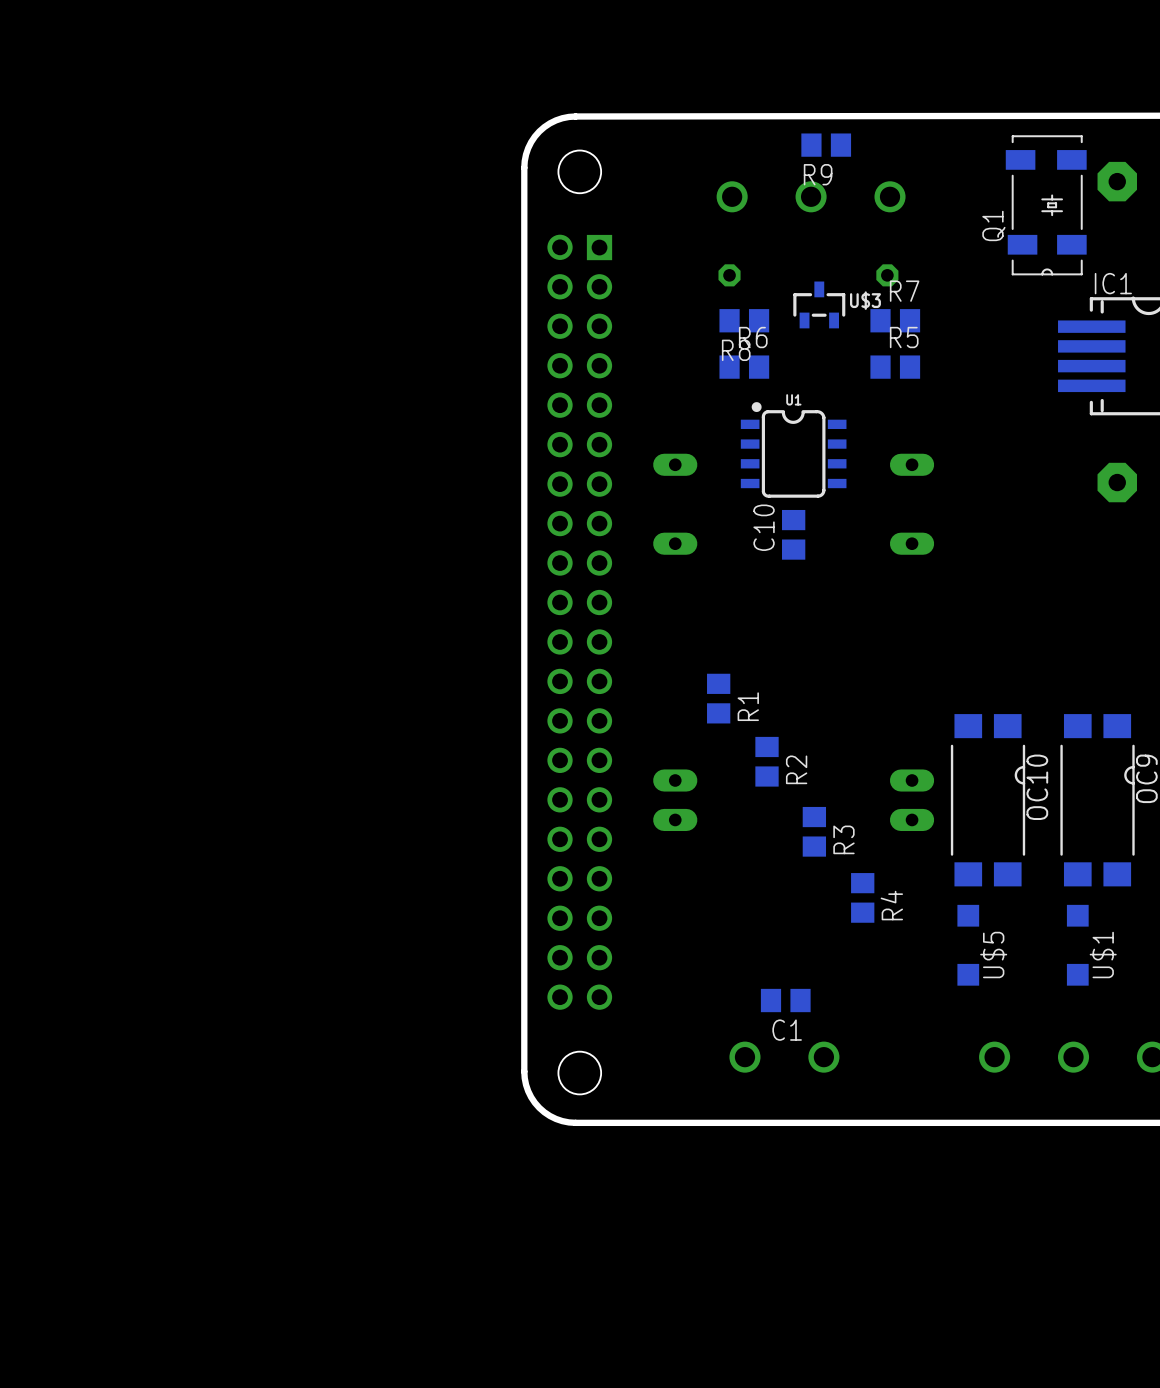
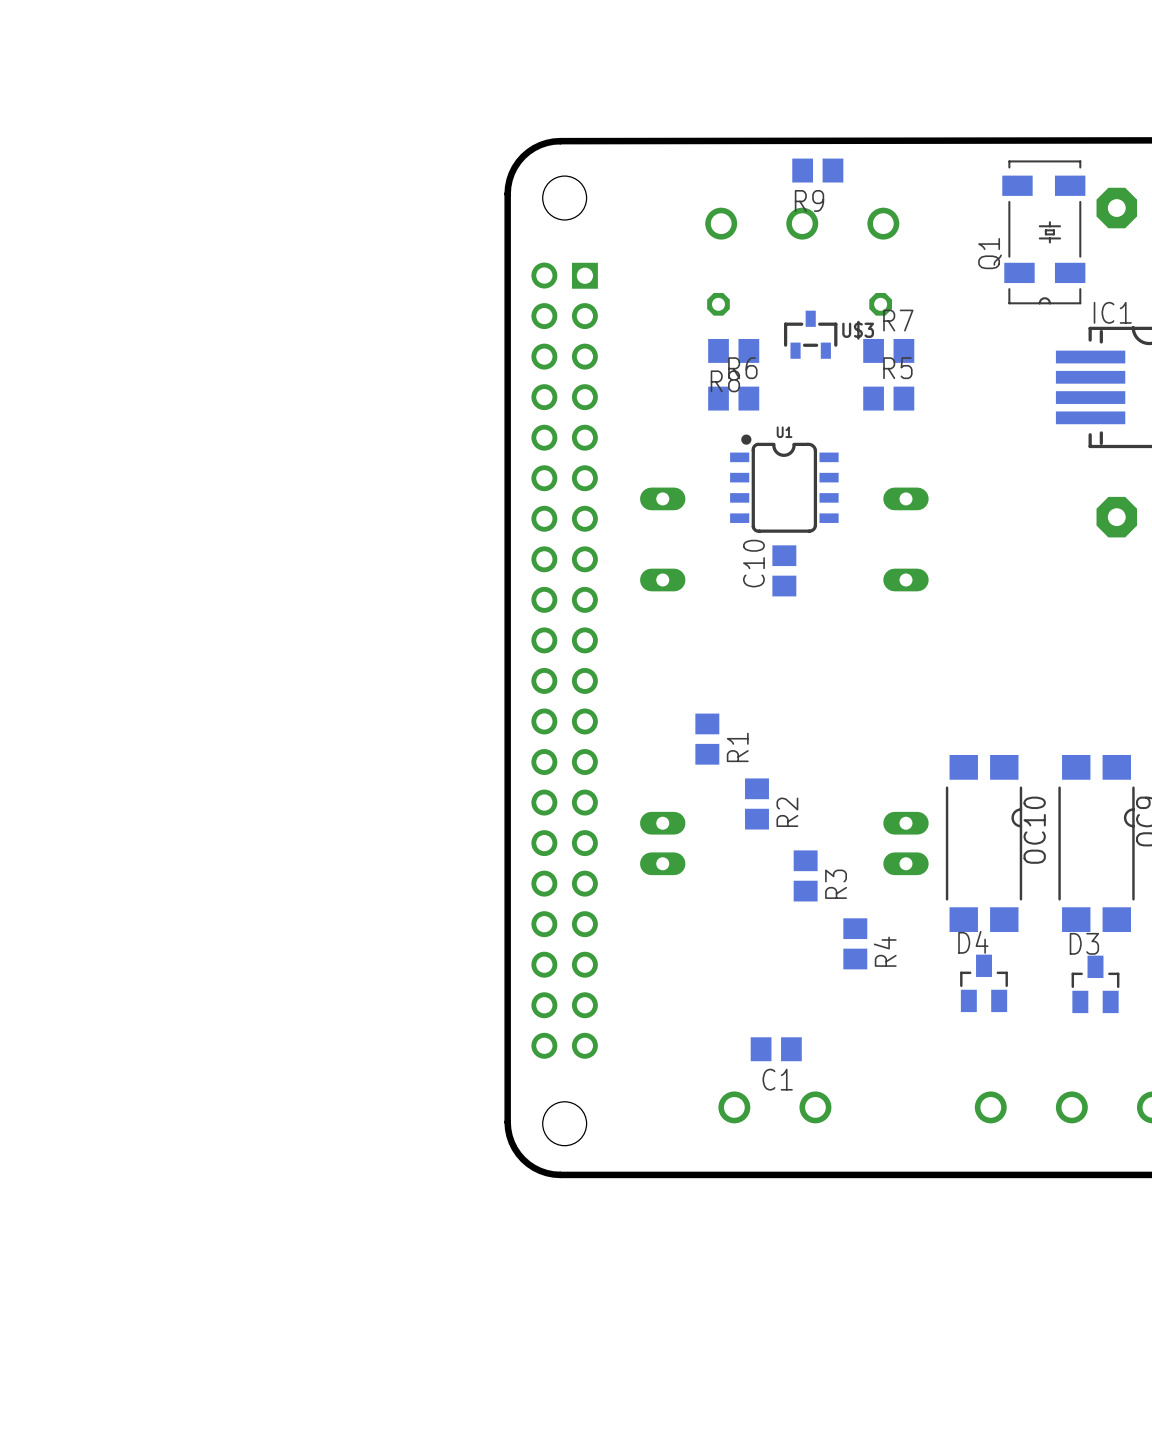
D4: none -> (984, 983)
D3: none -> (1095, 984)
U$5: (968, 945) -> none
U$1: (1077, 945) -> none

